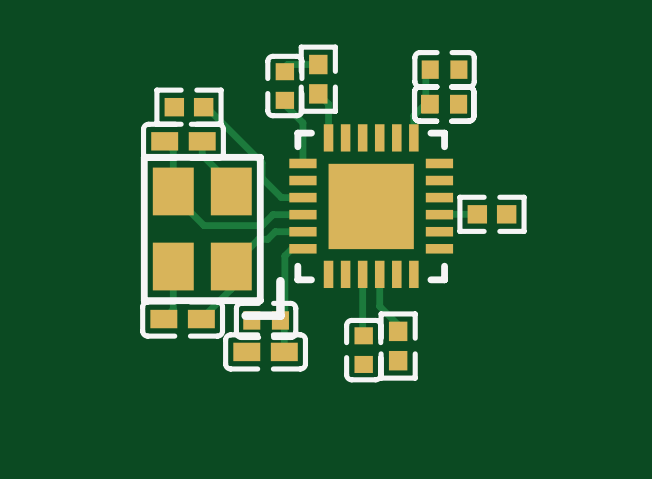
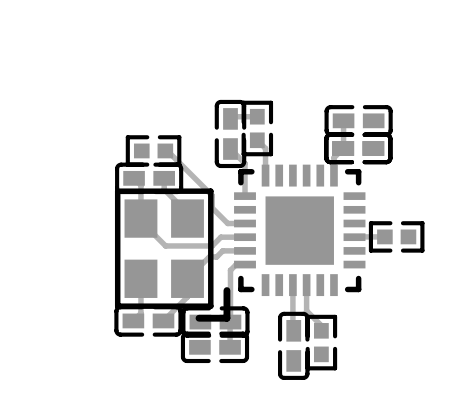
part footprint: [412, 50, 477, 90] -> [324, 105, 393, 137]
part footprint: [265, 53, 305, 119] -> [214, 99, 247, 169]
part footprint: [411, 84, 477, 124] -> [324, 132, 393, 165]
part footprint: [233, 300, 299, 341] -> [181, 306, 250, 338]
part footprint: [344, 317, 384, 383] -> [277, 311, 310, 380]

